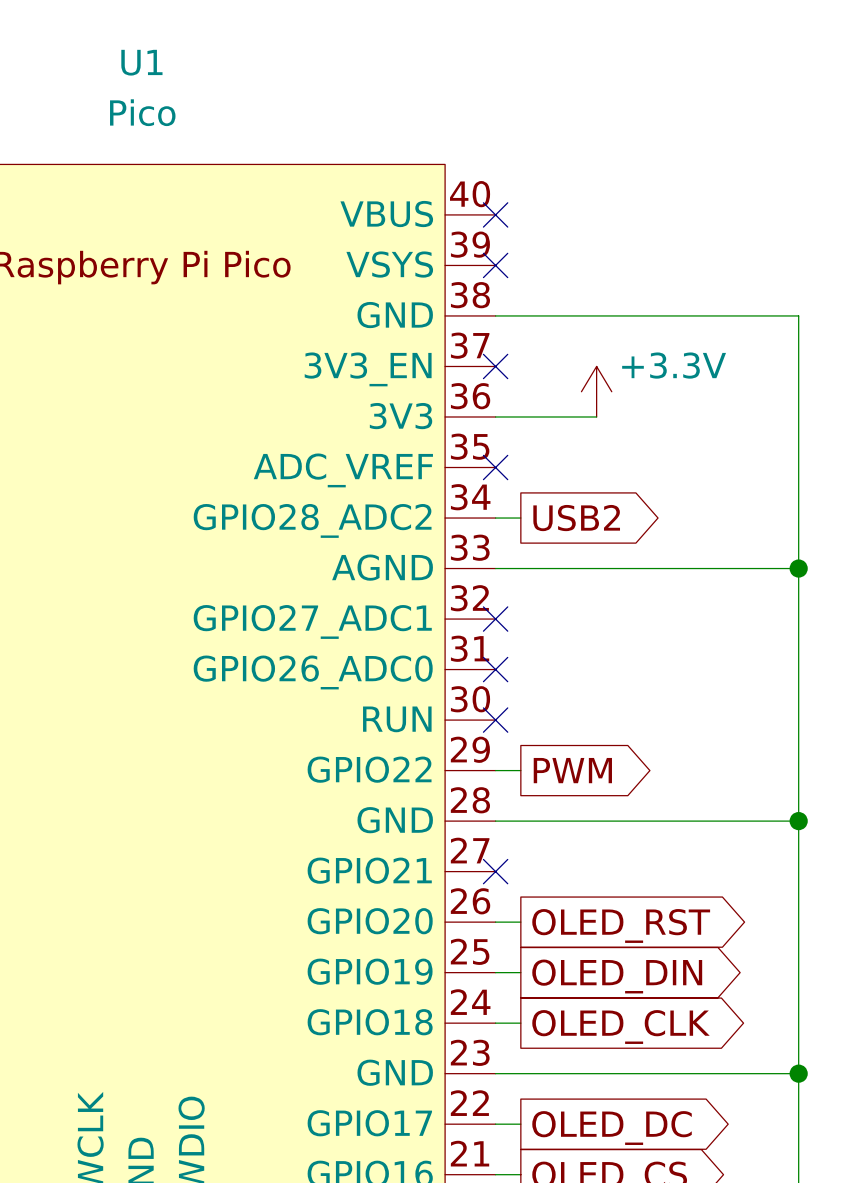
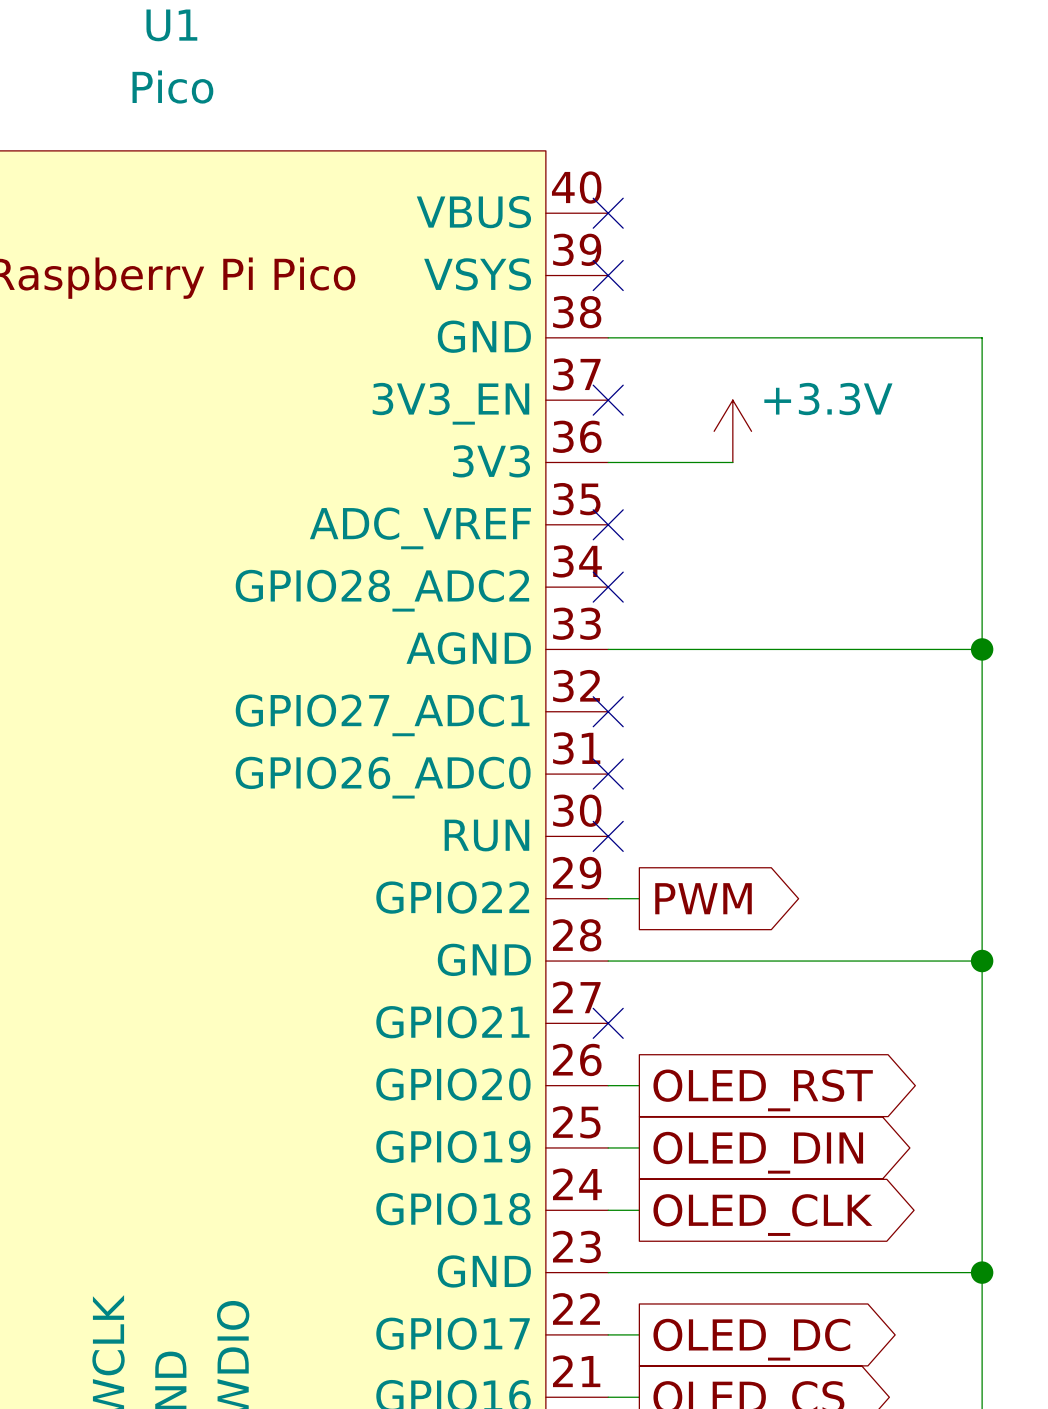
wire: (495, 518) (520, 518) -> none
no-connect mark: none -> (608, 587)
global label: USB2 (576, 518) -> none

